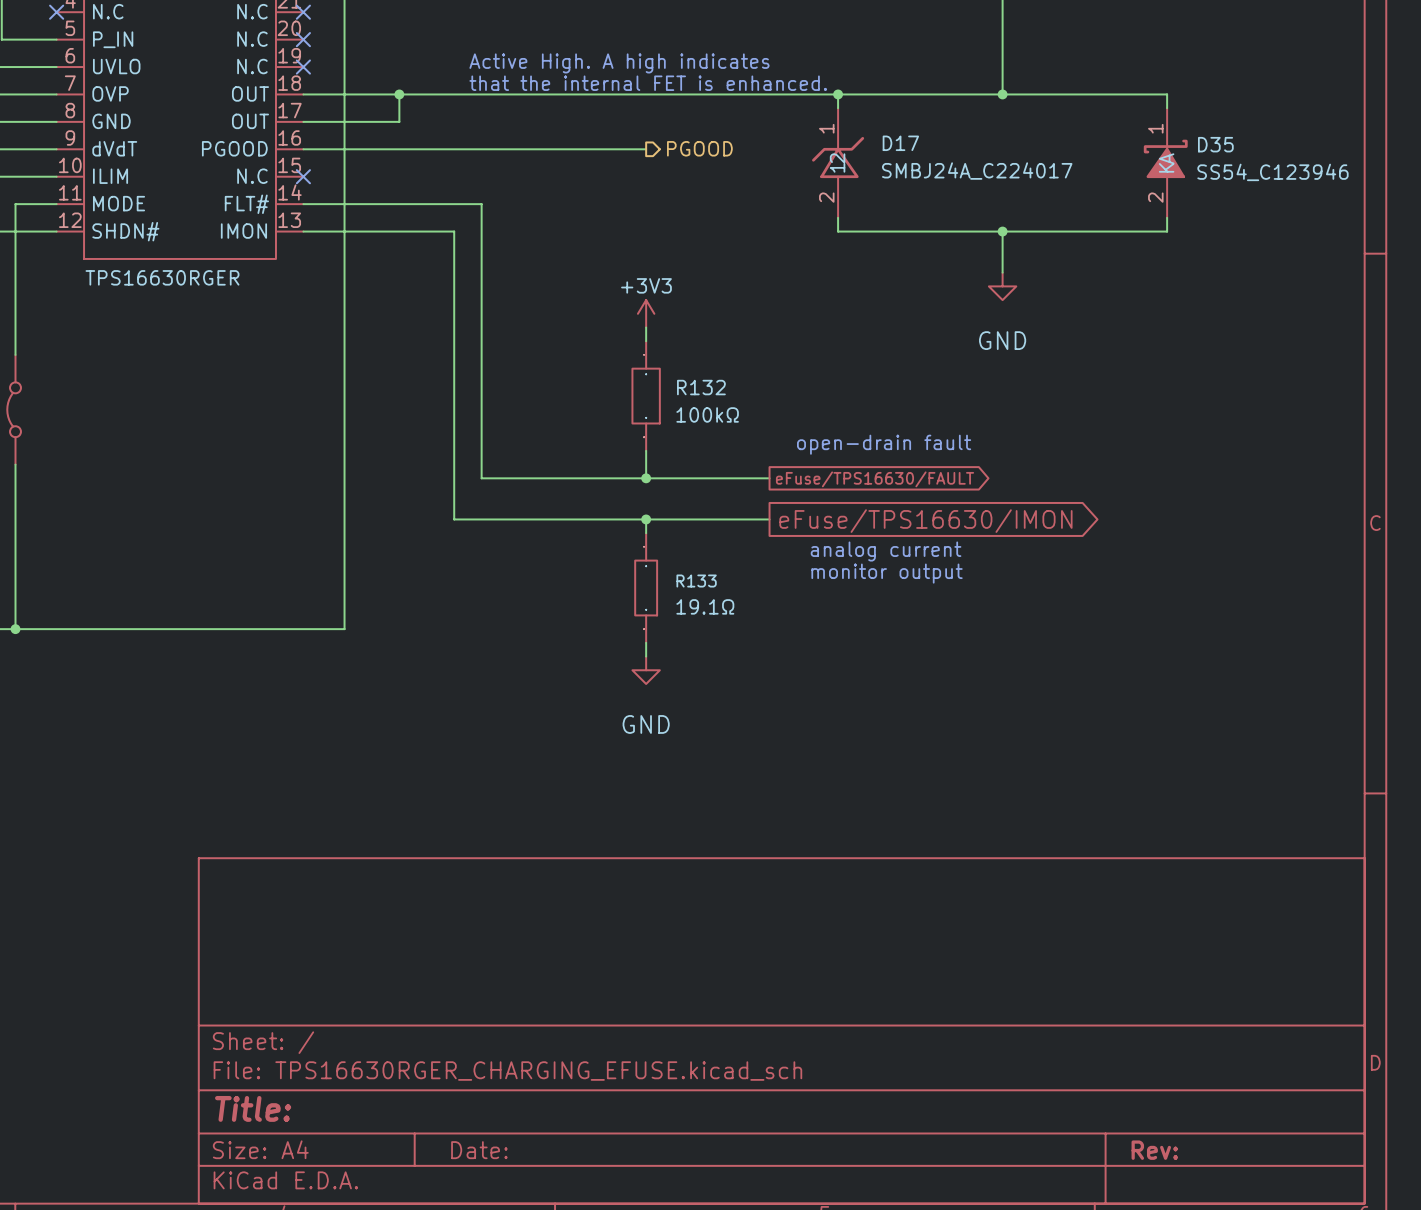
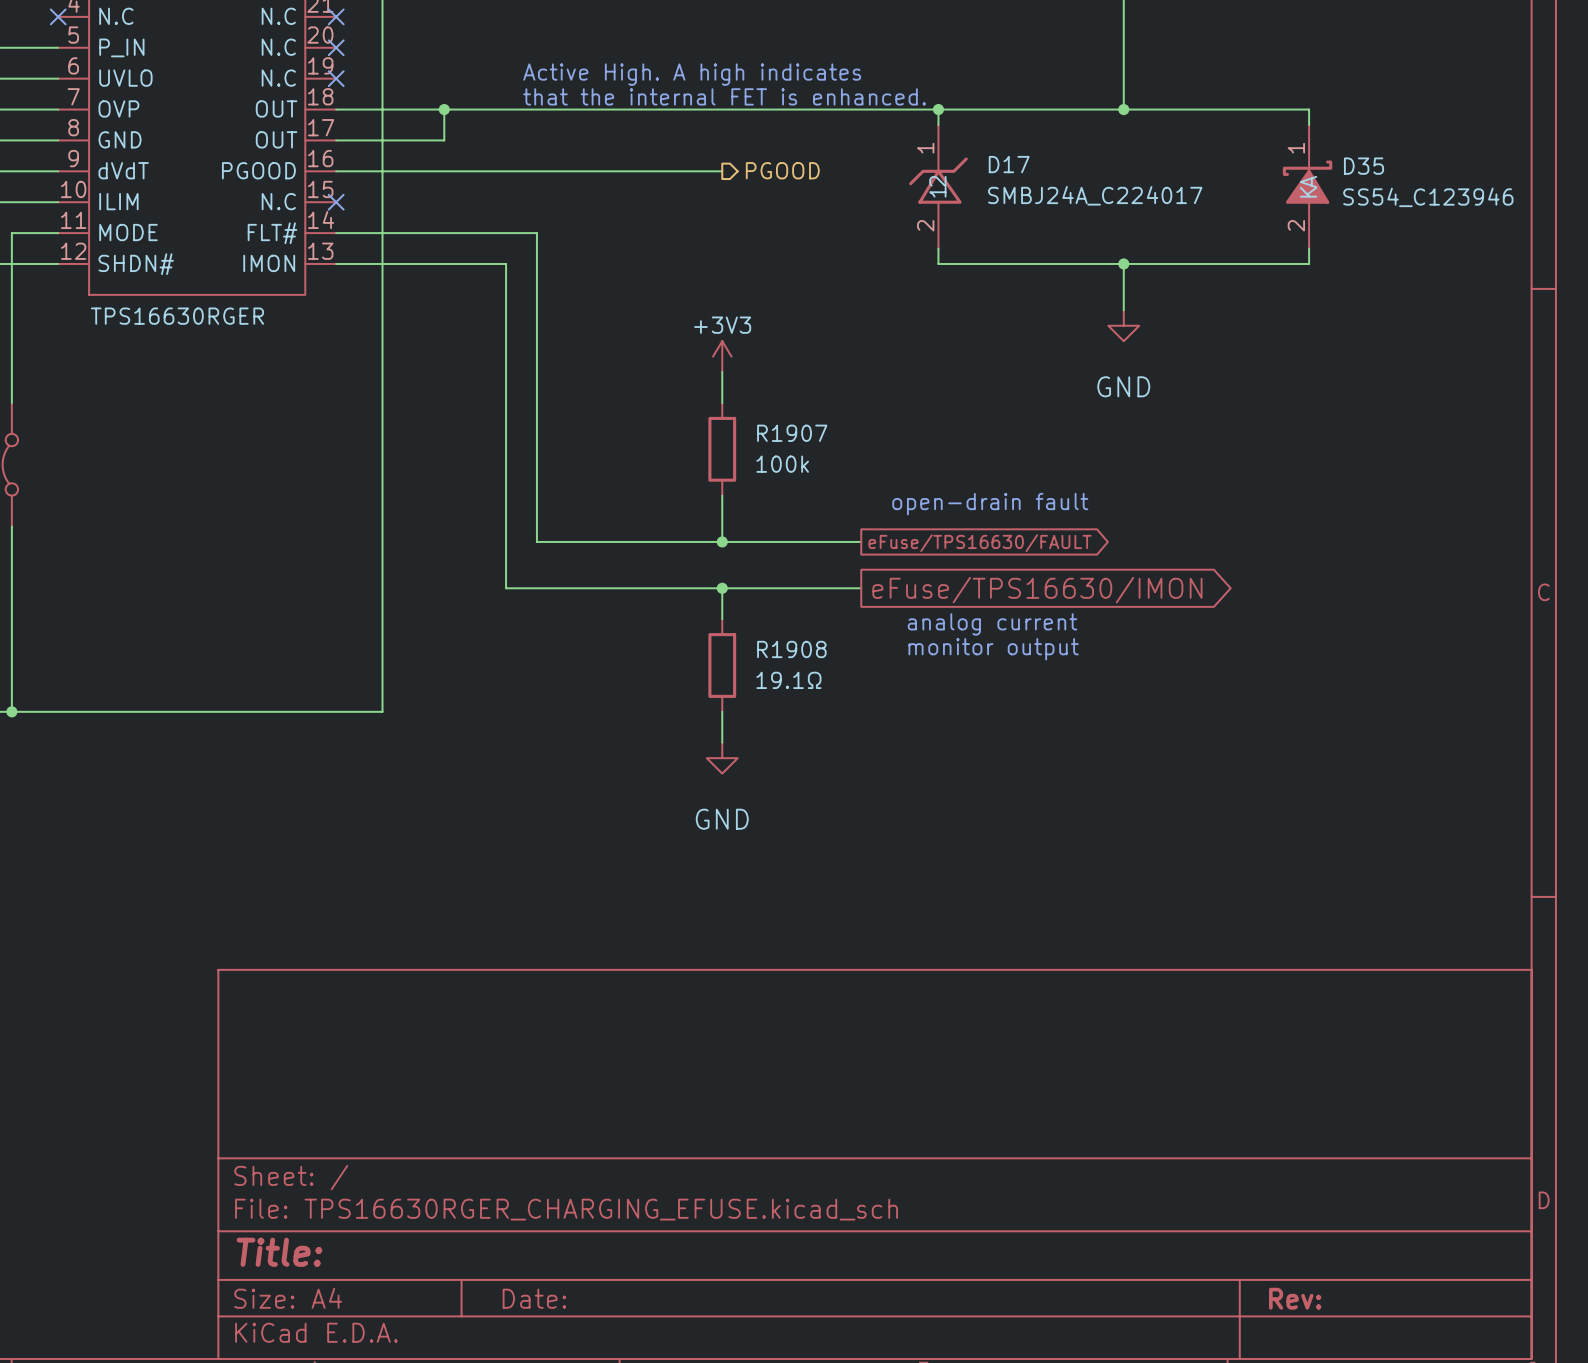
R132: 100kΩ (646, 396) -> none
R1907: none -> 100k (722, 449)
R133: 19.1Ω (646, 588) -> none
R1908: none -> 19.1Ω (722, 665)

